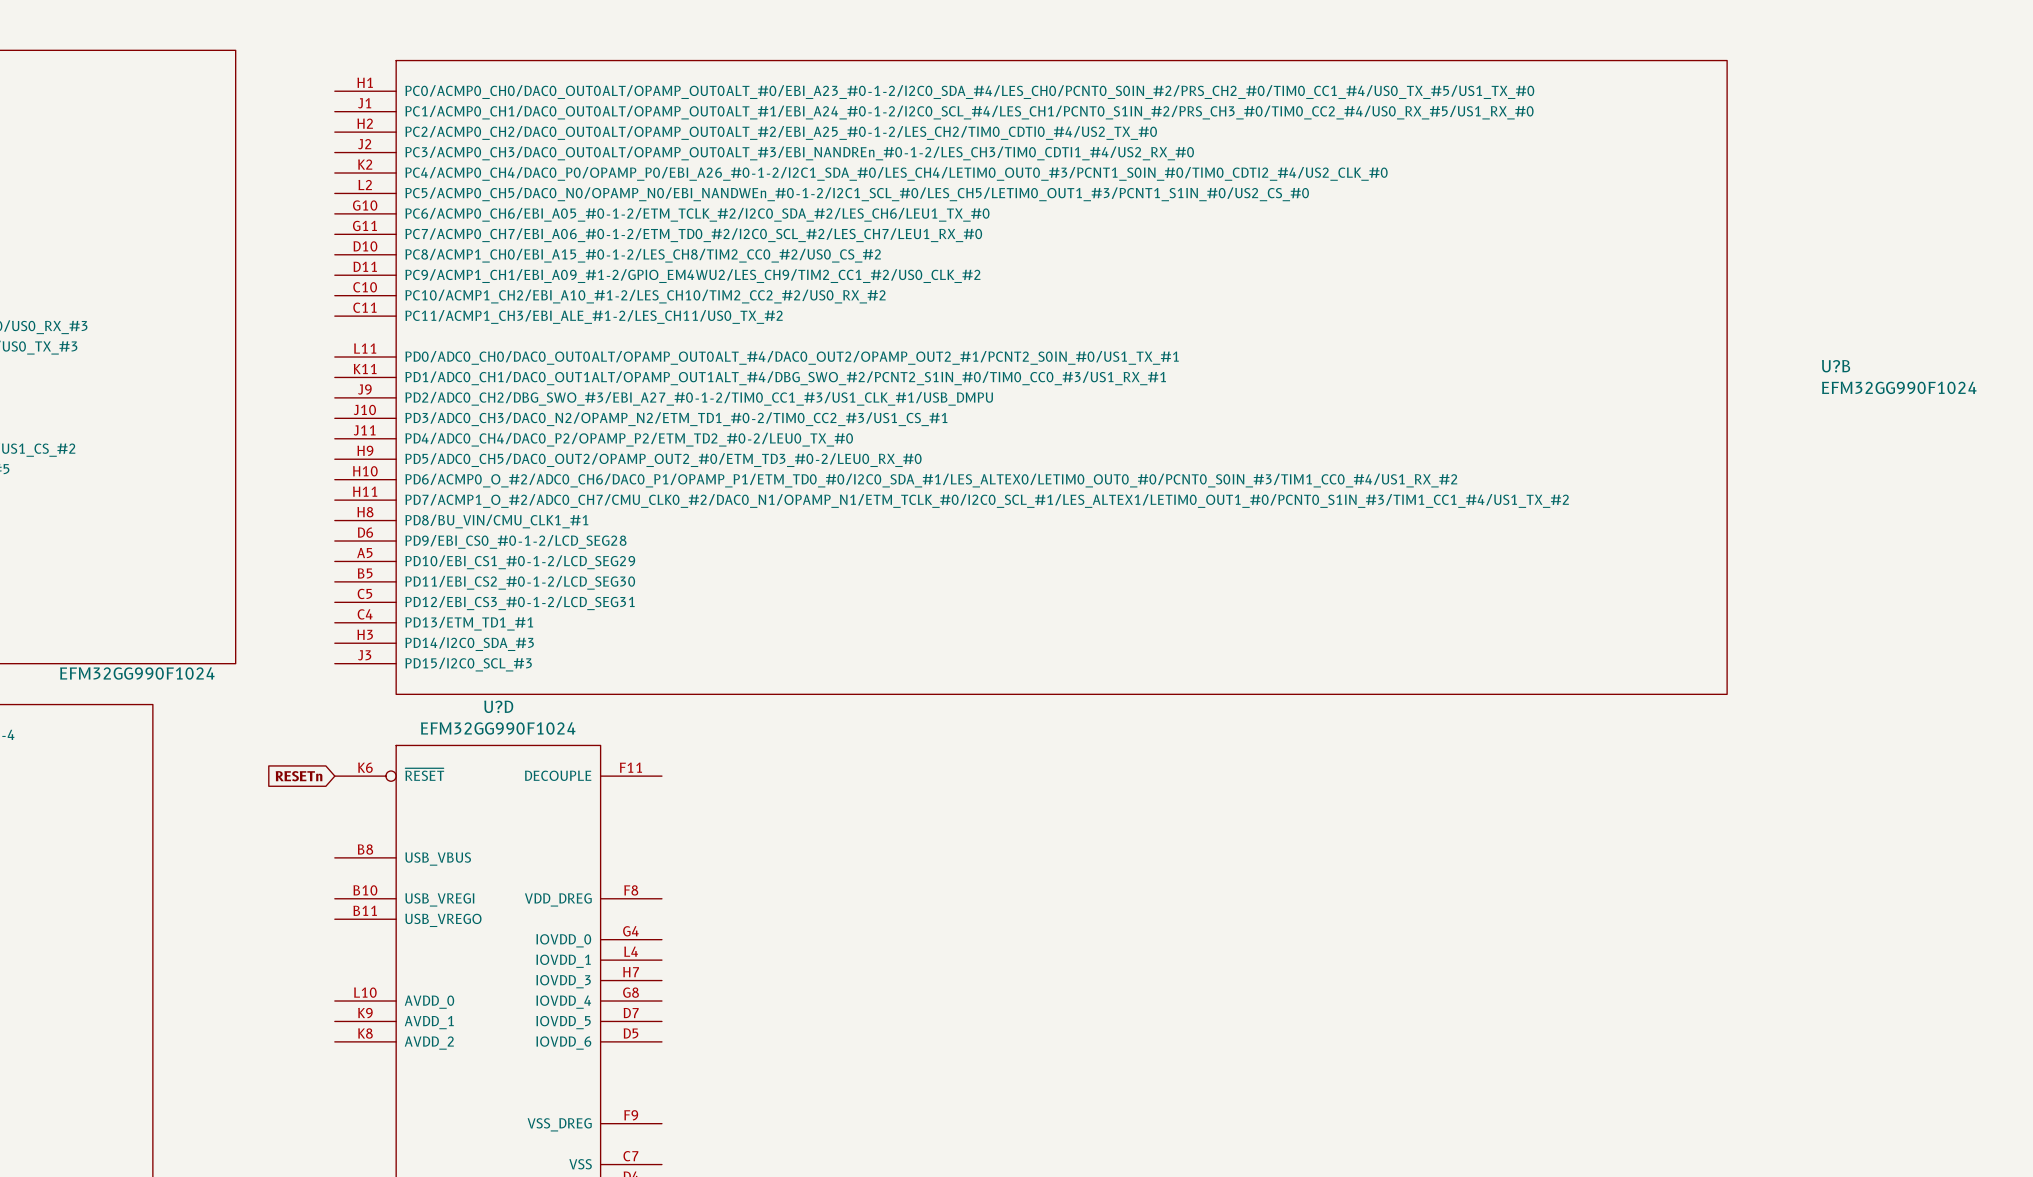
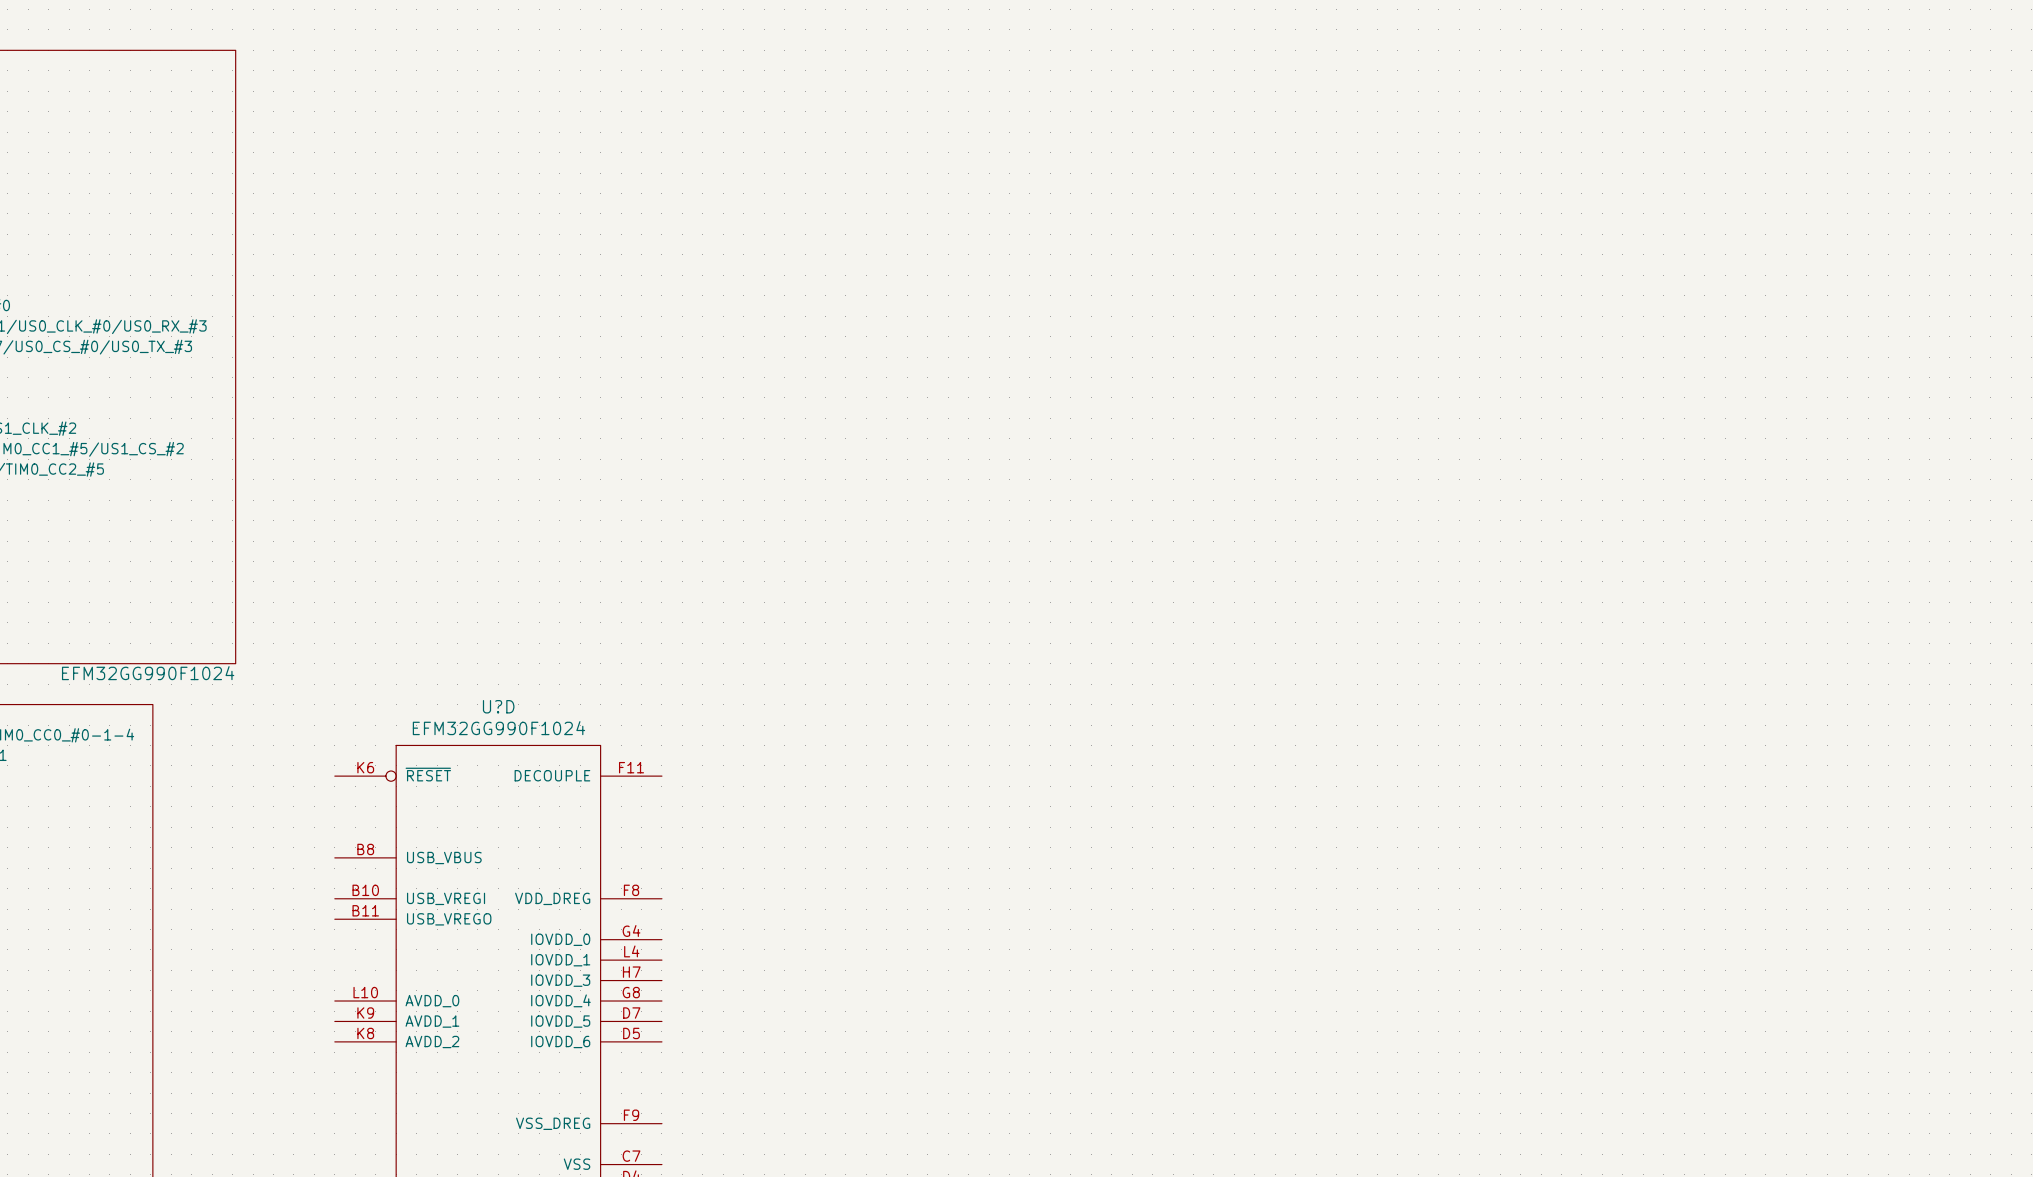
U?B: EFM32GG990F1024 (1030, 377) -> none
global label: RESETn (299, 776) -> none

